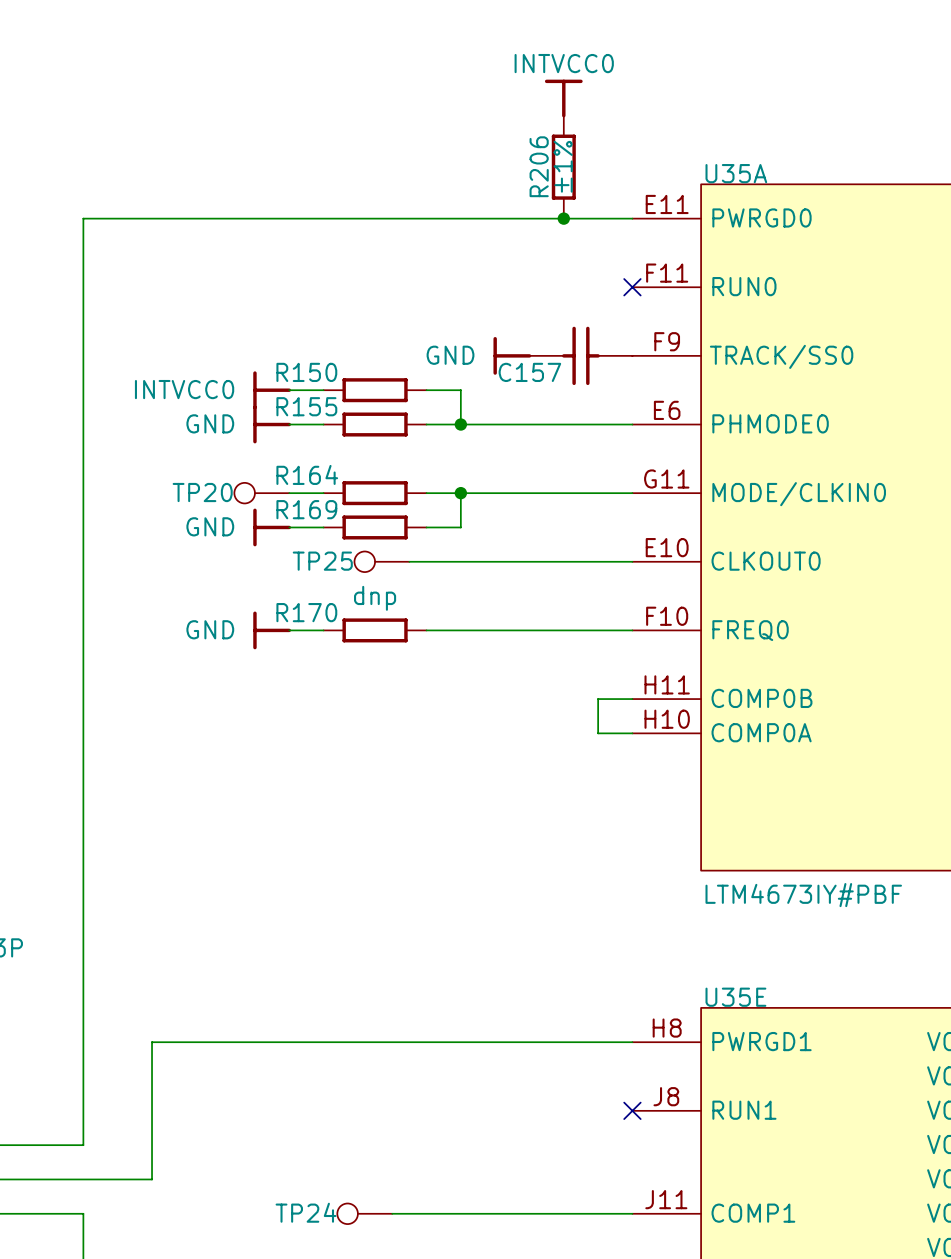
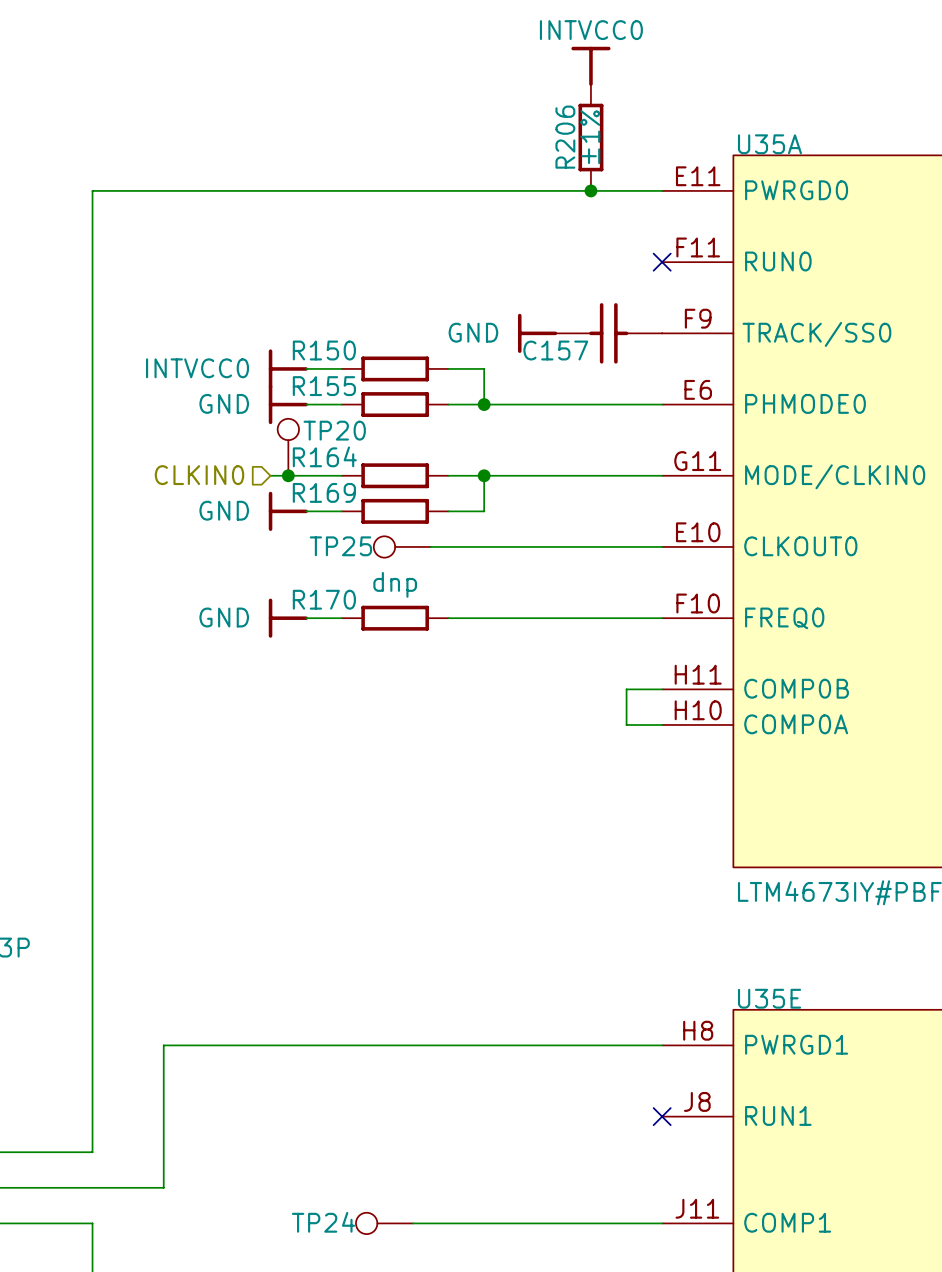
hierarchical label: none -> CLKIN0 (199, 475)
TP20 name position: TP20 (202, 492) -> TP20 (334, 430)
TP20 rotation: 0° (244, 493) -> 90° clockwise (288, 429)
junction: none -> (288, 475)

